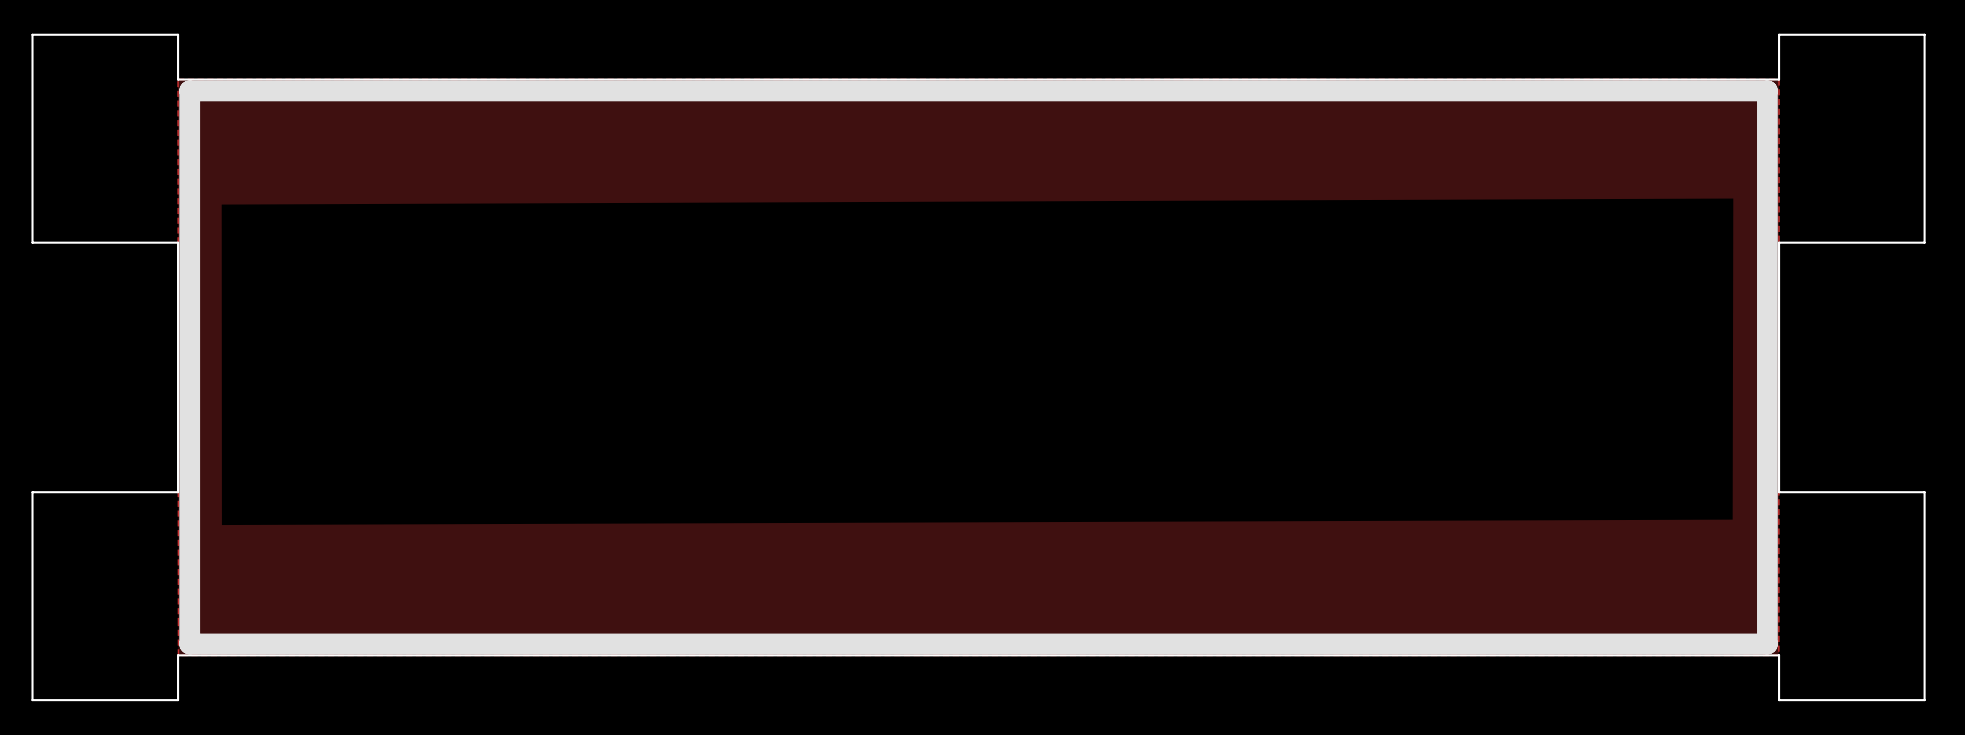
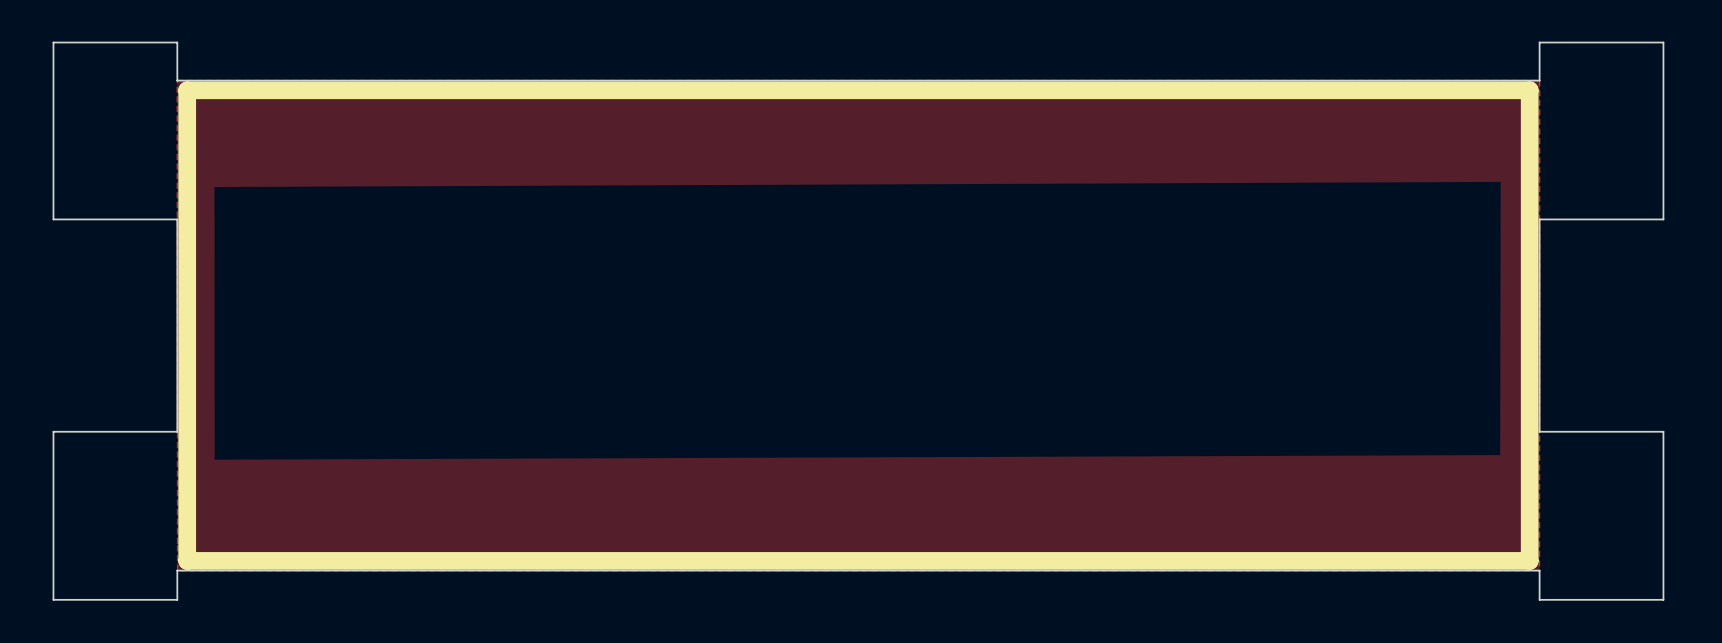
drawing shape: [31, 33, 1926, 702] -> [52, 41, 1665, 601]

